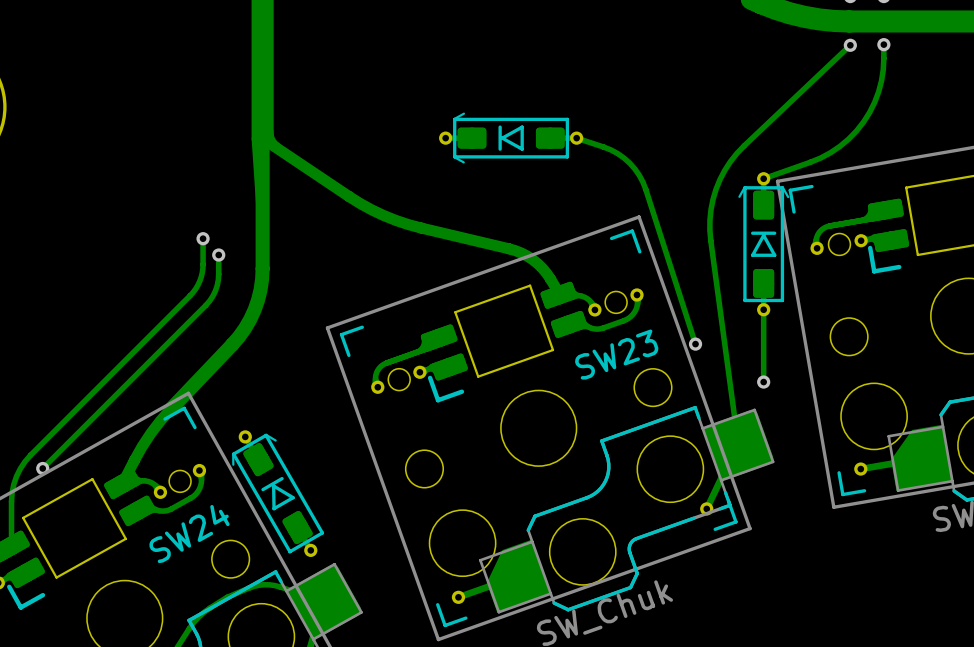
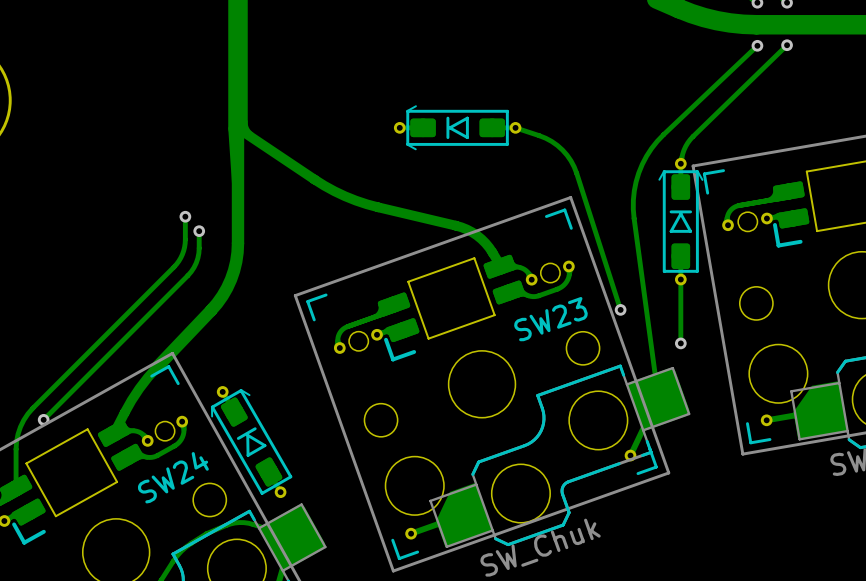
track: (883, 44) (883, 69) (878, 91) (869, 112) (856, 130) (840, 146) (820, 158) (763, 178) -> (787, 45) (690, 139) (684, 150) (680, 163)

